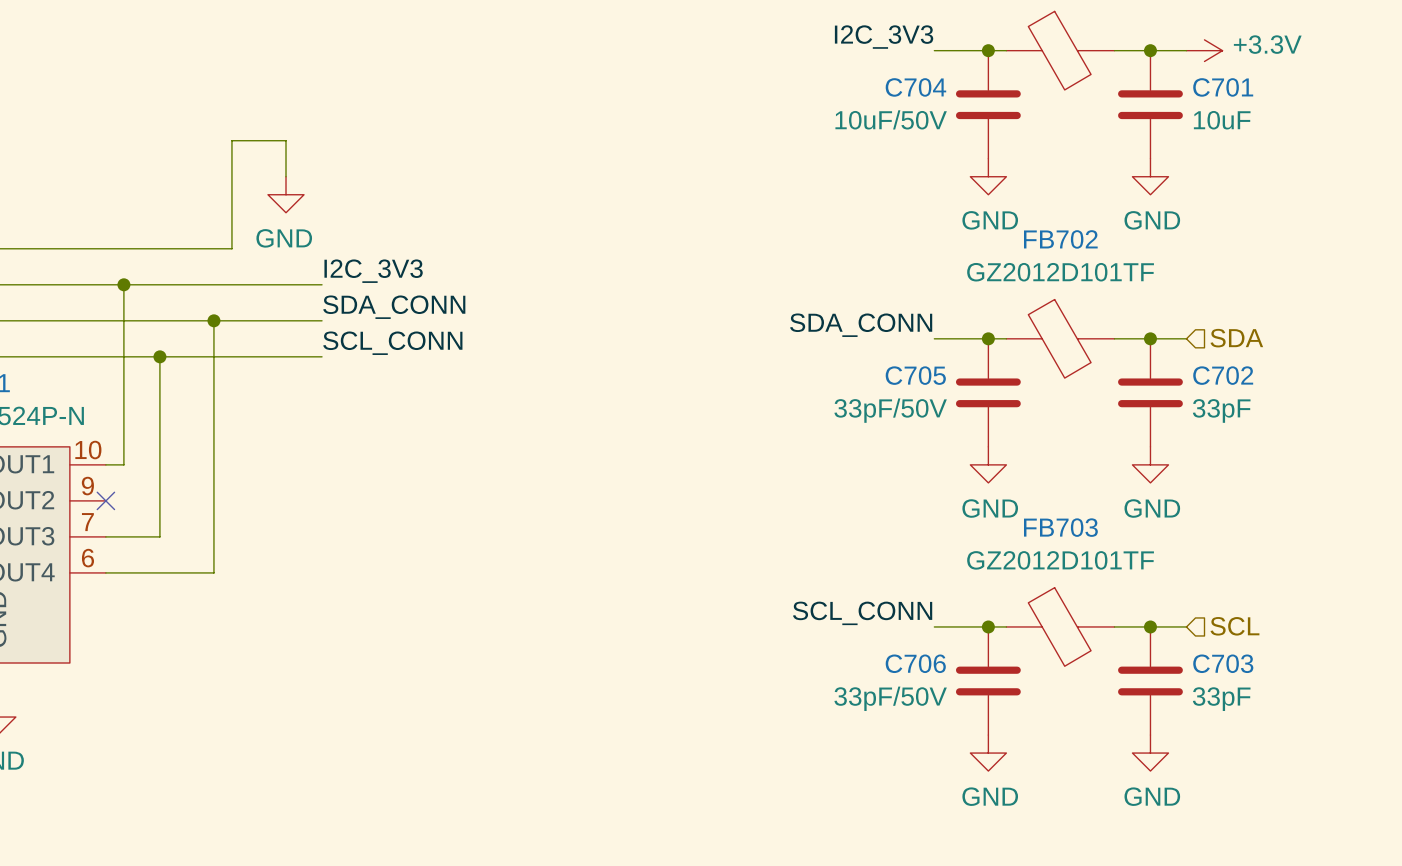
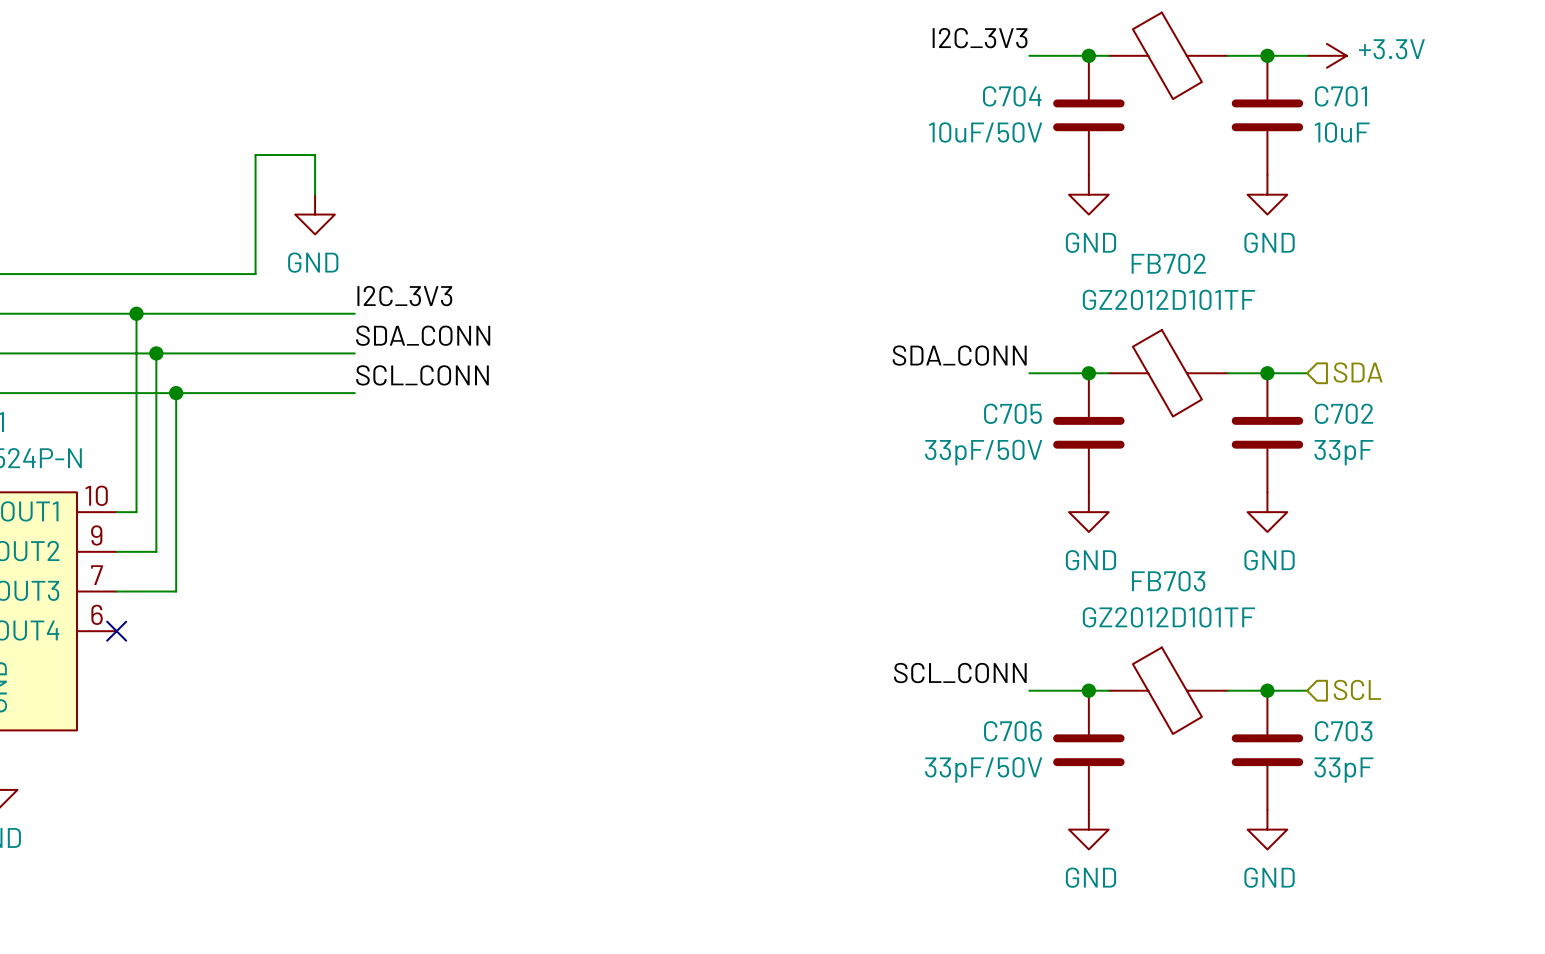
wire: none -> (156, 353) (156, 551) (116, 551)
wire: (213, 320) (213, 572) (105, 572) -> none
junction position: (213, 320) -> (156, 353)
no-connect mark position: (105, 500) -> (116, 631)

